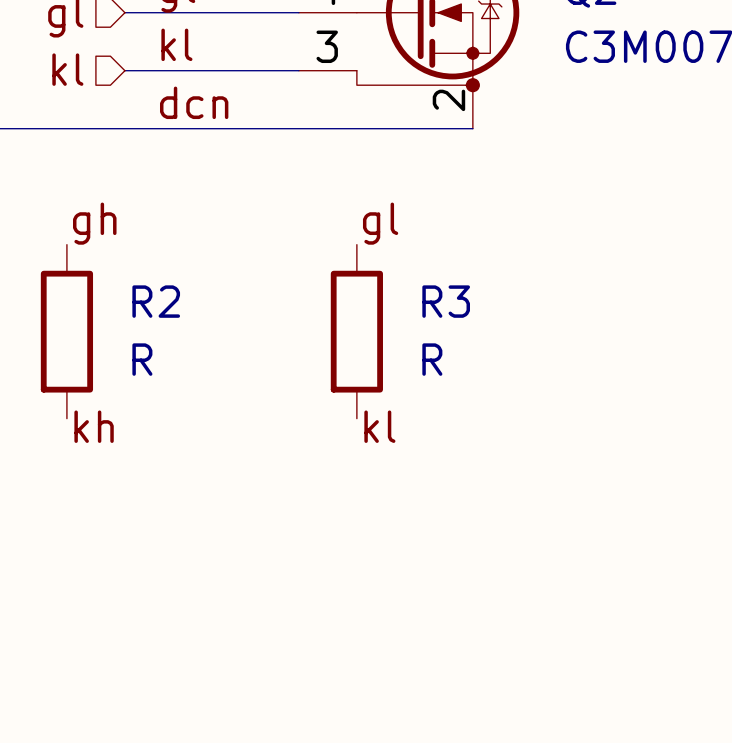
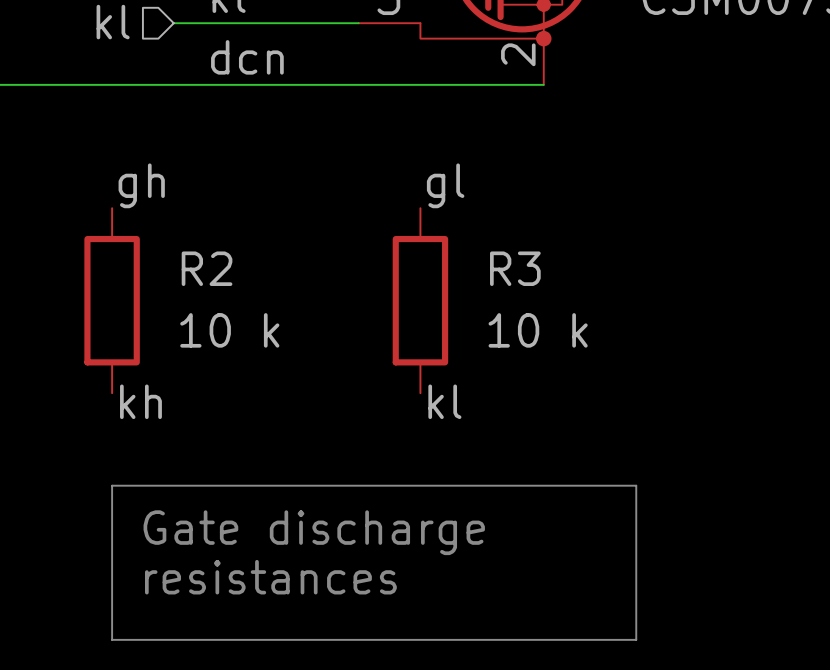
R2 value: R (142, 359) -> 10 k (229, 330)
R3 value: R (432, 359) -> 10 k (538, 330)
line: none -> (112, 485) (636, 485) (636, 639) (112, 639) (112, 485)
text: none -> Gate discharge (314, 532)
text: none -> resistances (270, 577)

